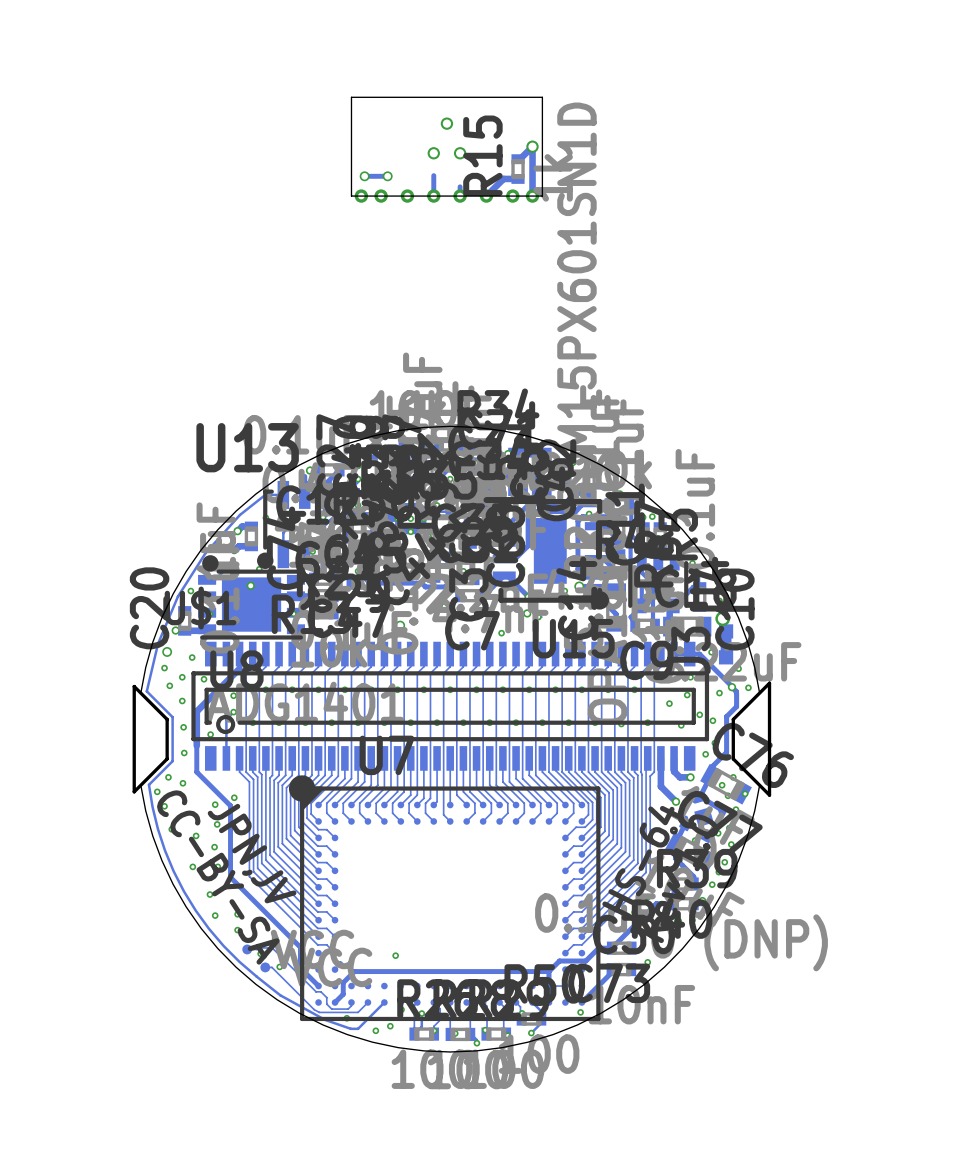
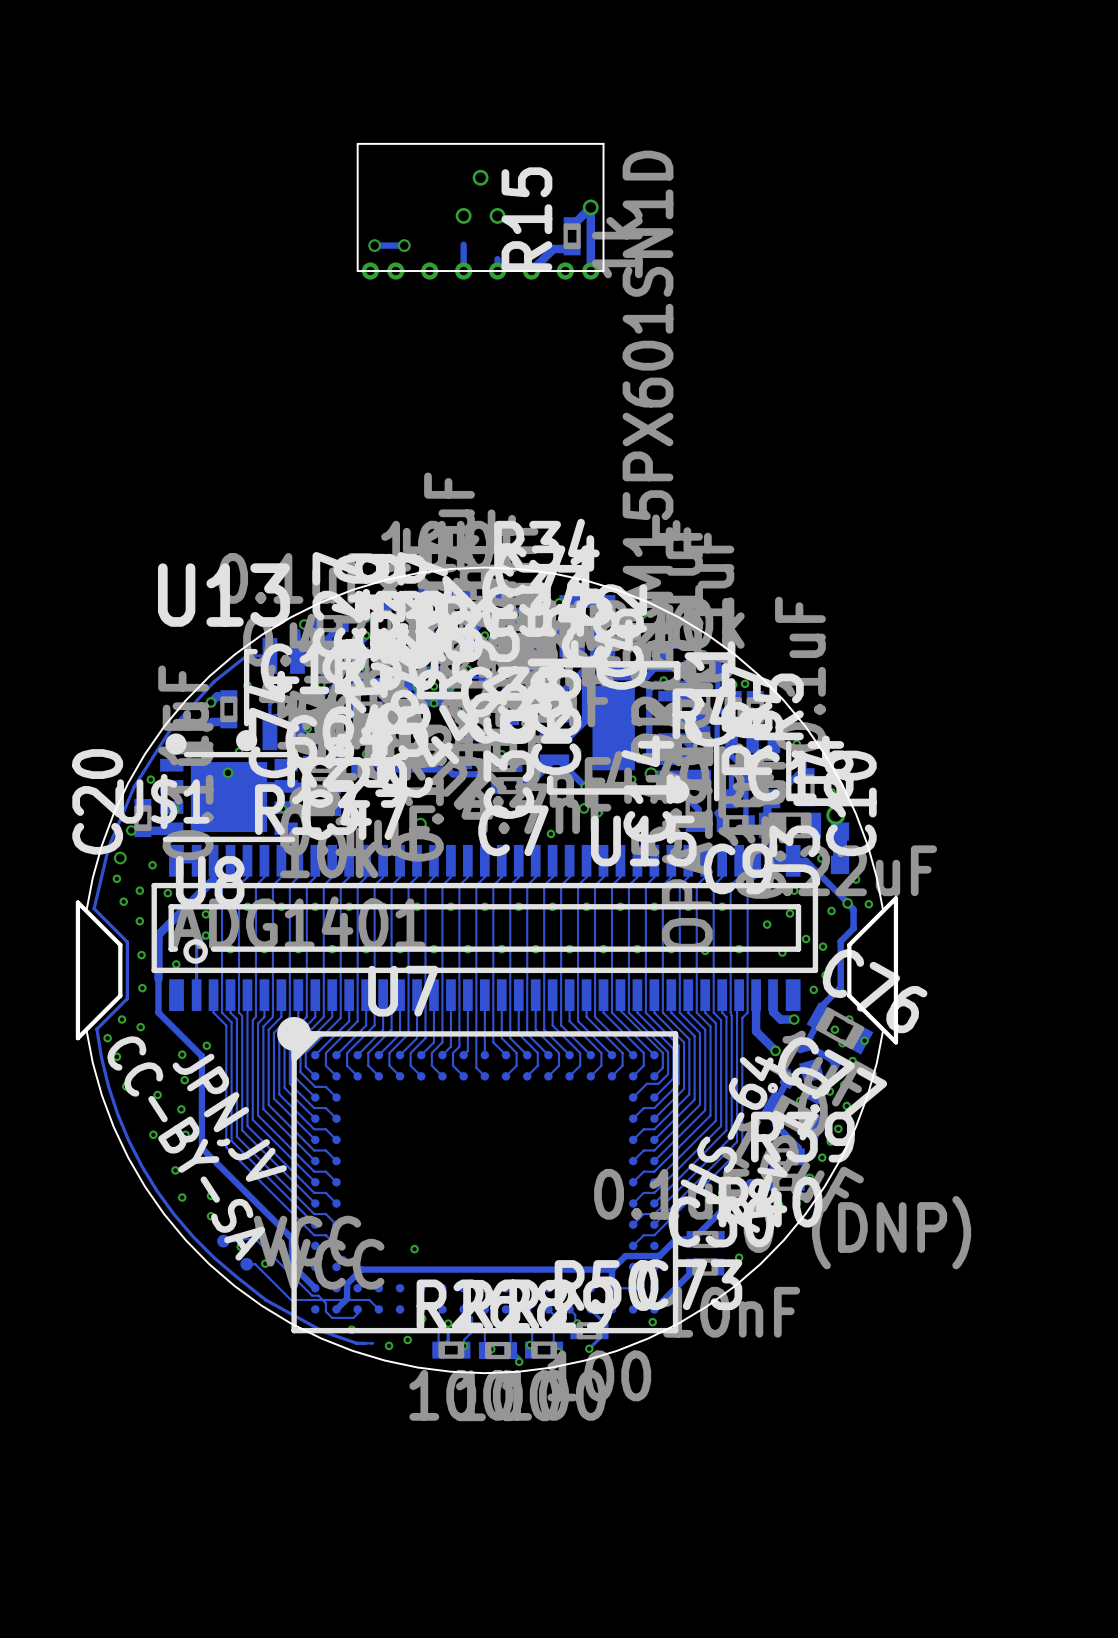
track: (299, 995) (319, 1012) (358, 1012) (367, 1002) -> (291, 1300) (369, 1300) (378, 1309)
track: (384, 1002) (358, 1028) -> (370, 1343) (372, 1343) (366, 1343)

